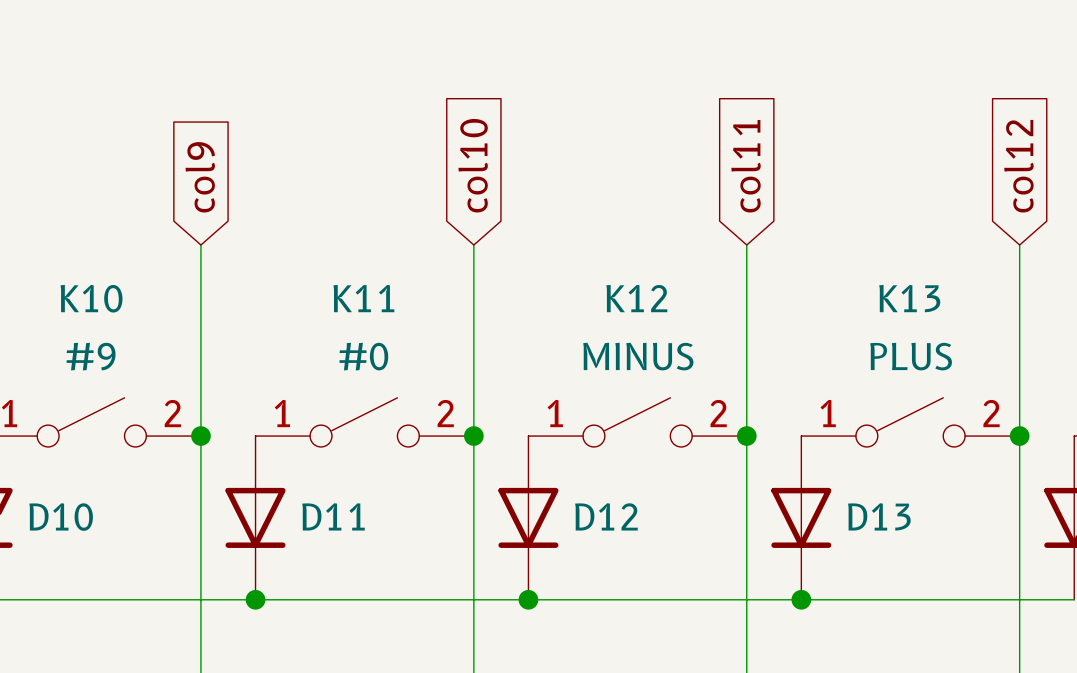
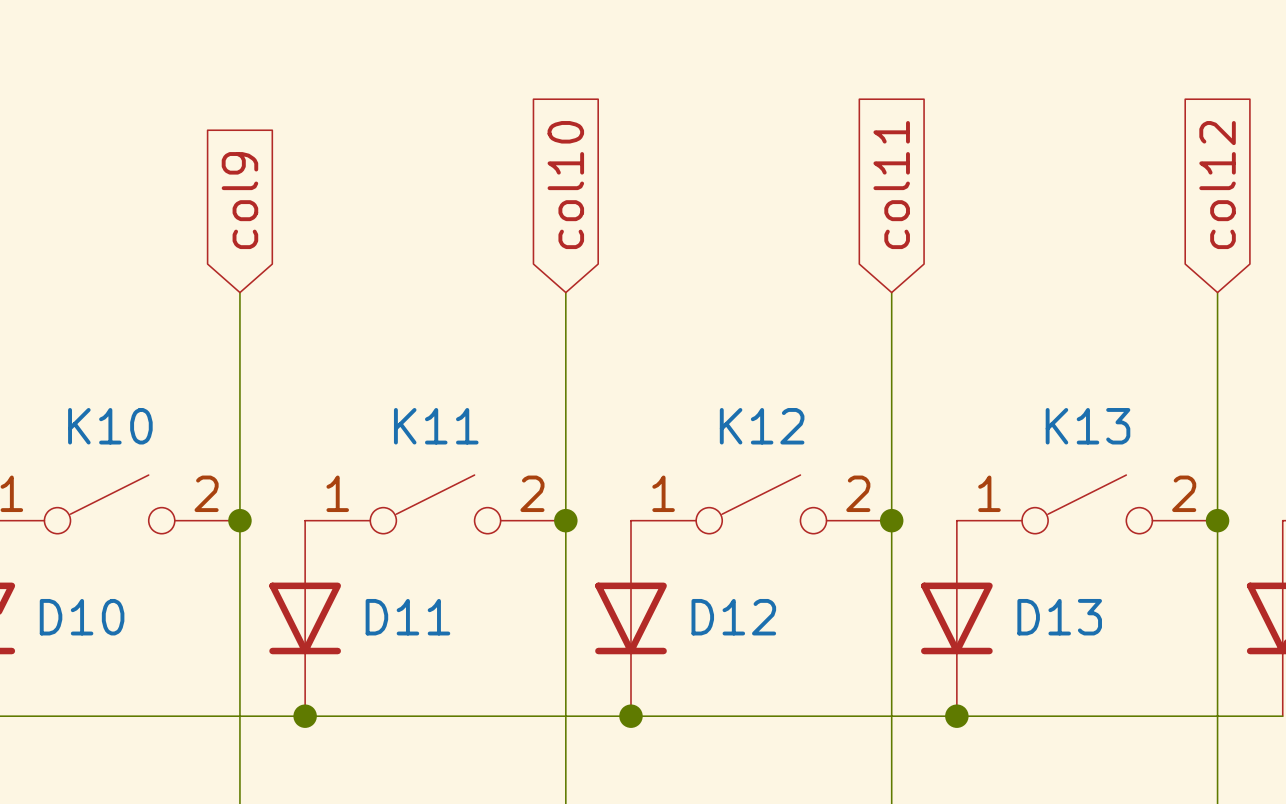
K10 name position: K10 (91, 298) -> K10 (110, 426)
K11 name position: K11 (363, 298) -> K11 (436, 426)
K12 name position: K12 (636, 298) -> K12 (762, 426)
K13 name position: K13 (909, 298) -> K13 (1087, 426)
K10 value: #9 (91, 356) -> none
K11 value: #0 (363, 356) -> none
K12 value: MINUS (638, 356) -> none
K13 value: PLUS (911, 356) -> none

